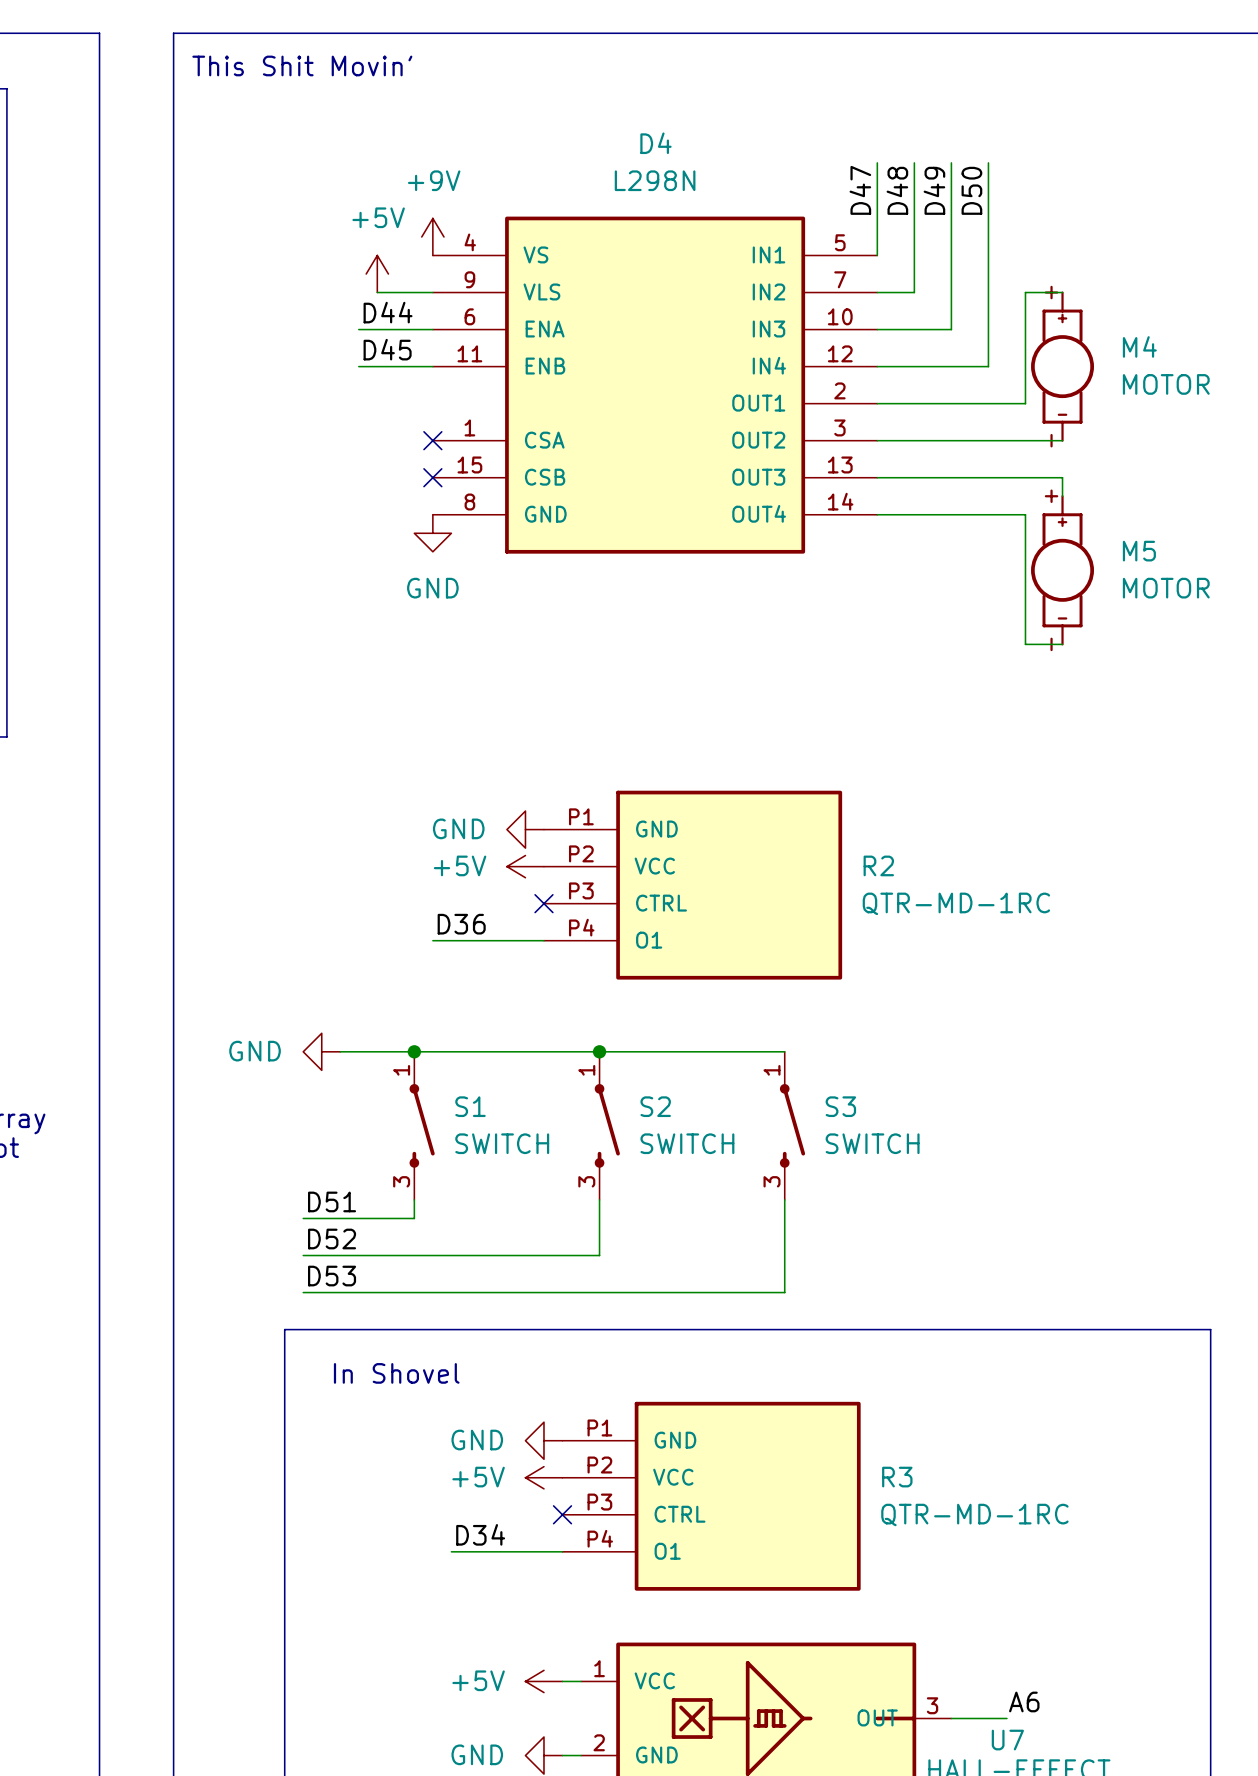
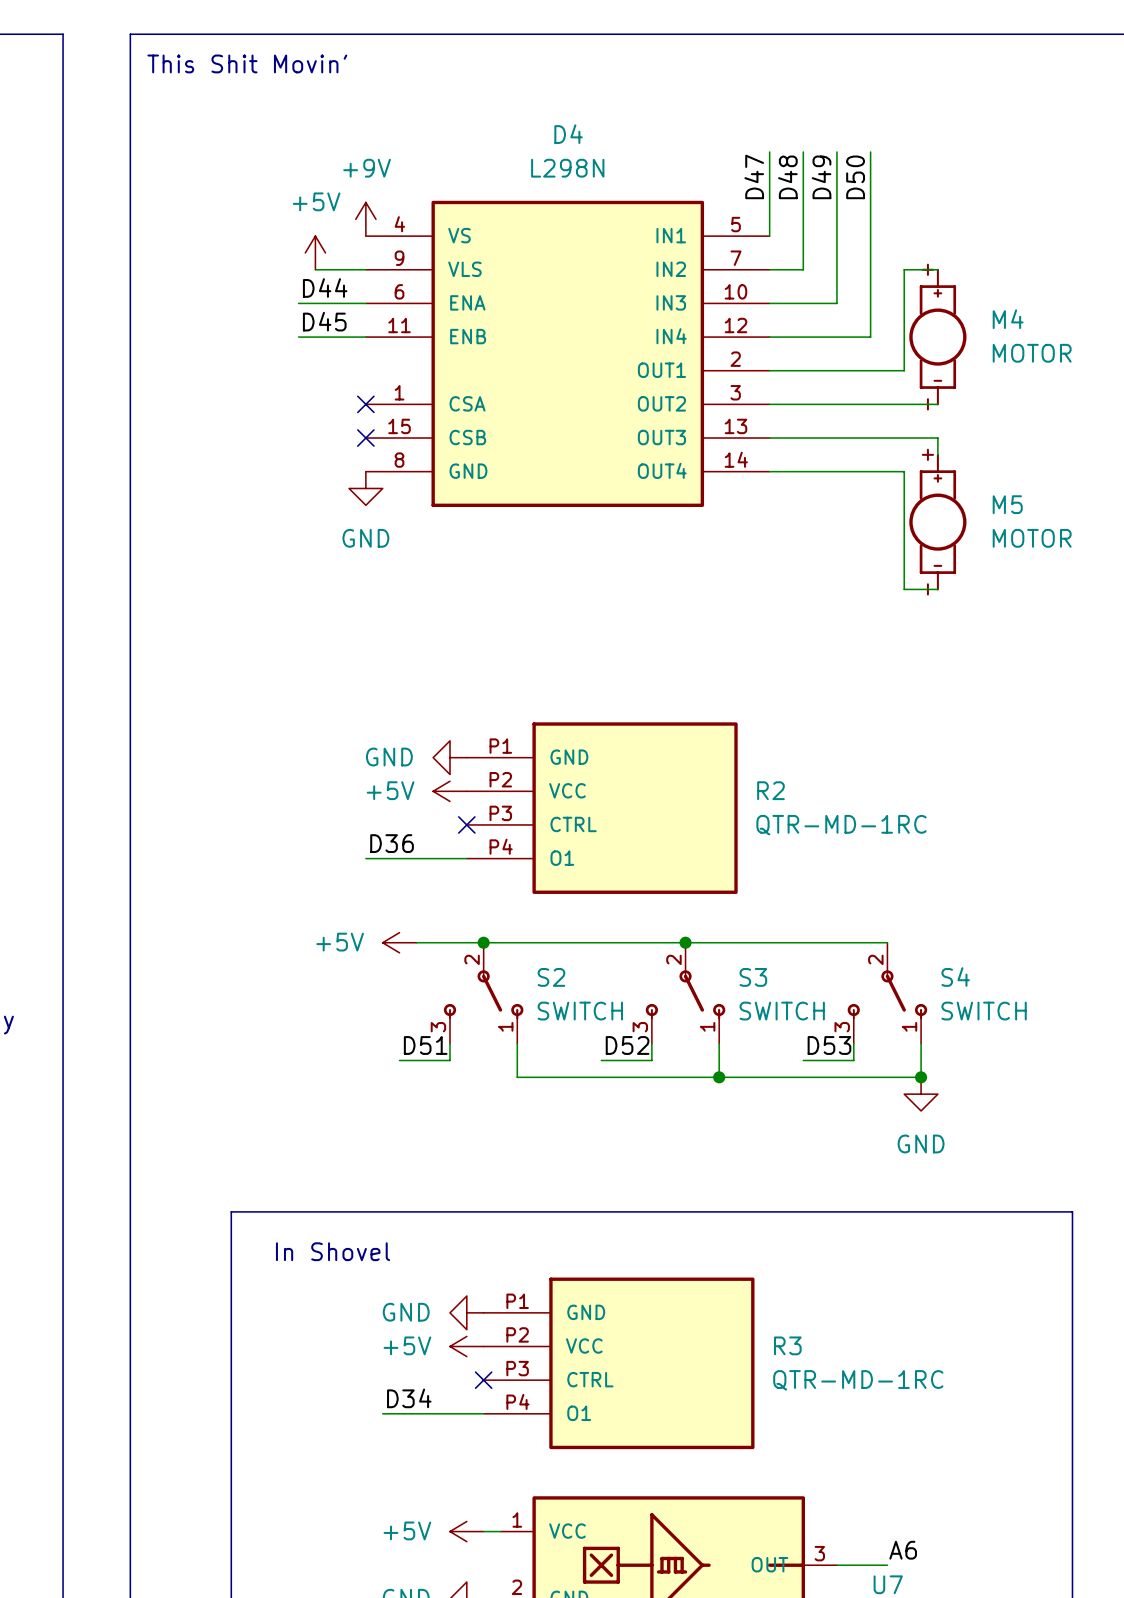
power symbol: none -> +5V (399, 942)
wire: none -> (416, 942) (887, 942)
junction: none -> (685, 942)
power symbol: GND (321, 1051) -> none
wire: (340, 1051) (784, 1051) -> none
junction: (414, 1051) -> none
S2 symbol: [594, 1051, 620, 1200] -> [443, 942, 524, 1044]
junction position: (599, 1051) -> (483, 942)
S3 symbol: [779, 1051, 806, 1200] -> [645, 942, 726, 1044]
S4: none -> SWITCH (887, 993)
S1: SWITCH (422, 1125) -> none
wire: none -> (450, 1043) (450, 1060) (399, 1060)
wire: none -> (517, 1043) (517, 1077) (921, 1077) (921, 1043)
wire: none -> (651, 1043) (651, 1060) (601, 1060)
wire: none -> (719, 1043) (719, 1077)
wire: none -> (853, 1043) (853, 1060) (803, 1060)
label: none -> D52 (627, 1045)
label: none -> D53 (829, 1045)
junction: none -> (719, 1077)
junction: none -> (921, 1077)
wire: (414, 1199) (414, 1218) (303, 1218) -> none
wire: (599, 1199) (599, 1255) (303, 1255) -> none
wire: (784, 1199) (784, 1292) (303, 1292) -> none
power symbol: none -> GND (921, 1094)
label position: D51 (332, 1201) -> D51 (425, 1045)
label: D52 (332, 1239) -> none
label: D53 (332, 1276) -> none

